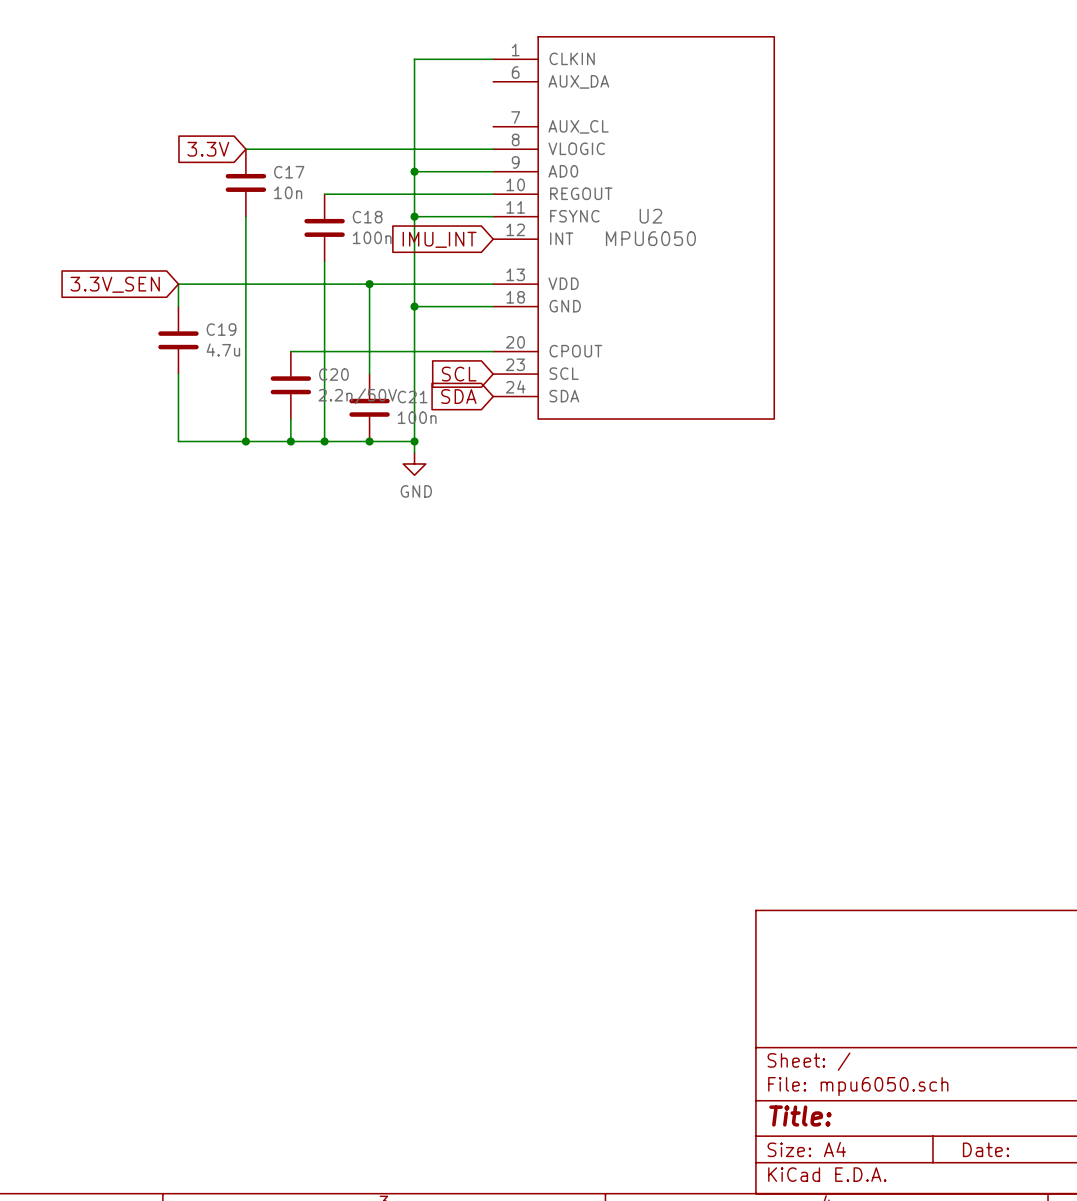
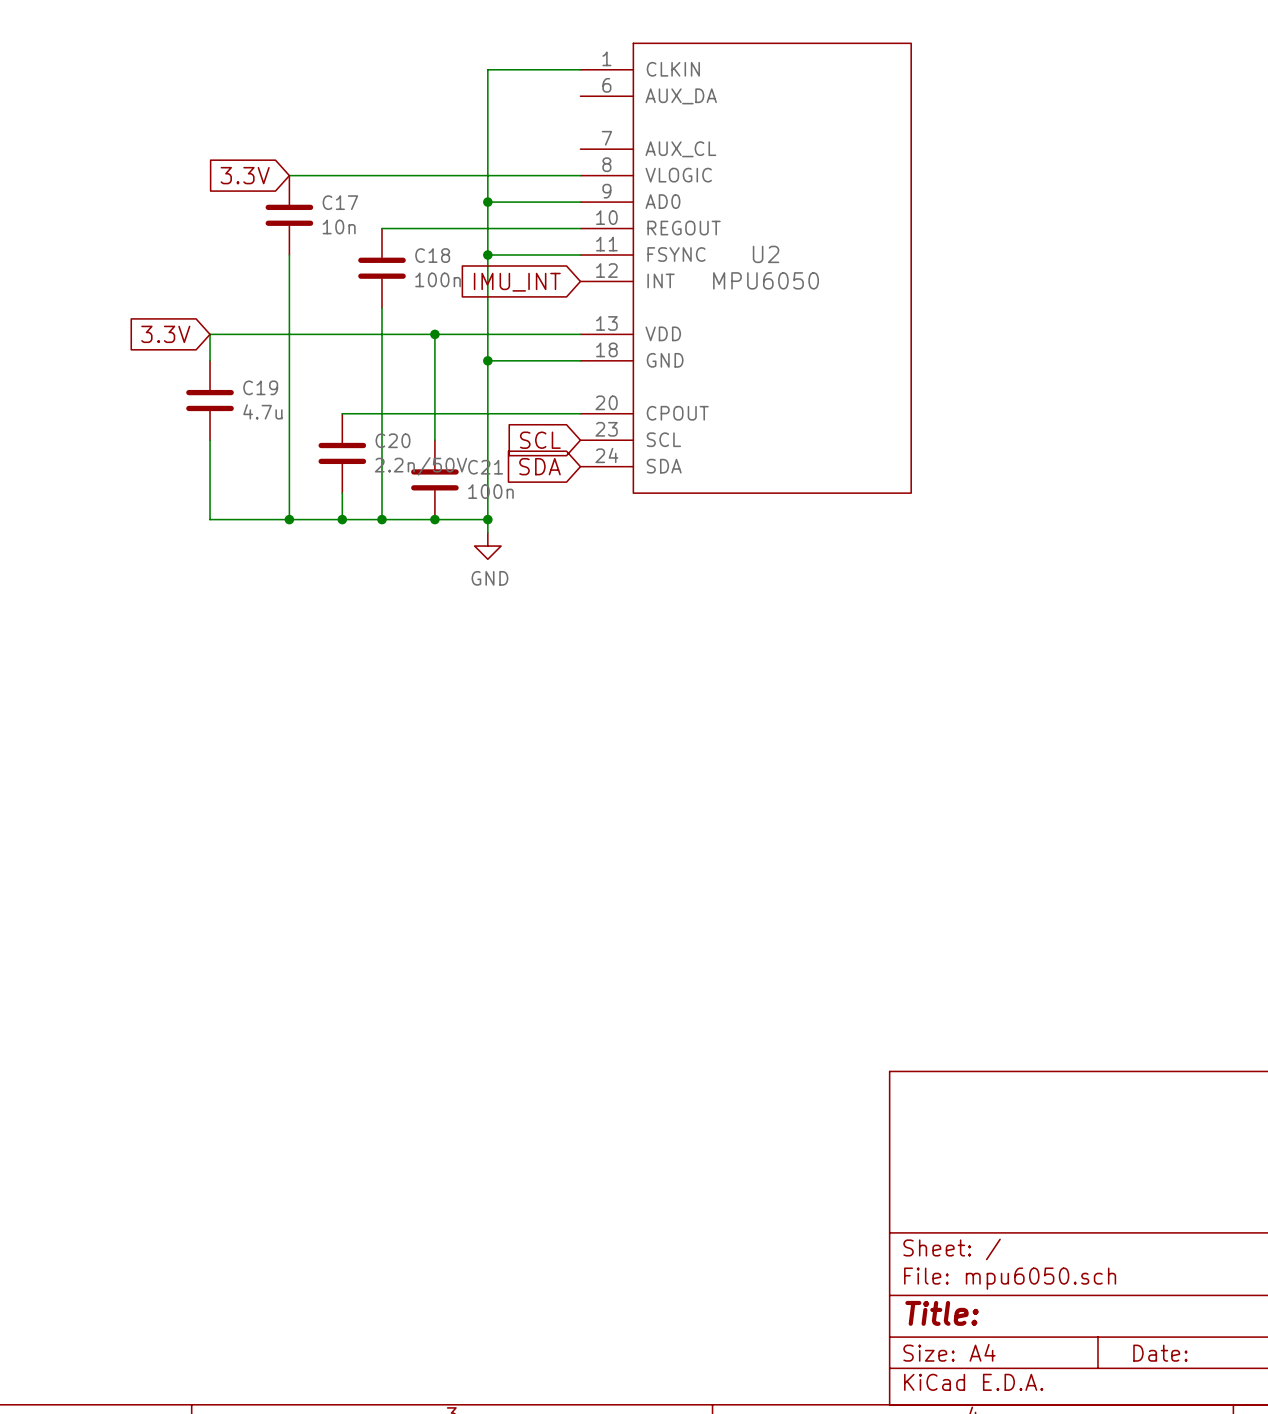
global label: 3.3V_SEN (115, 284) -> 3.3V (165, 334)

